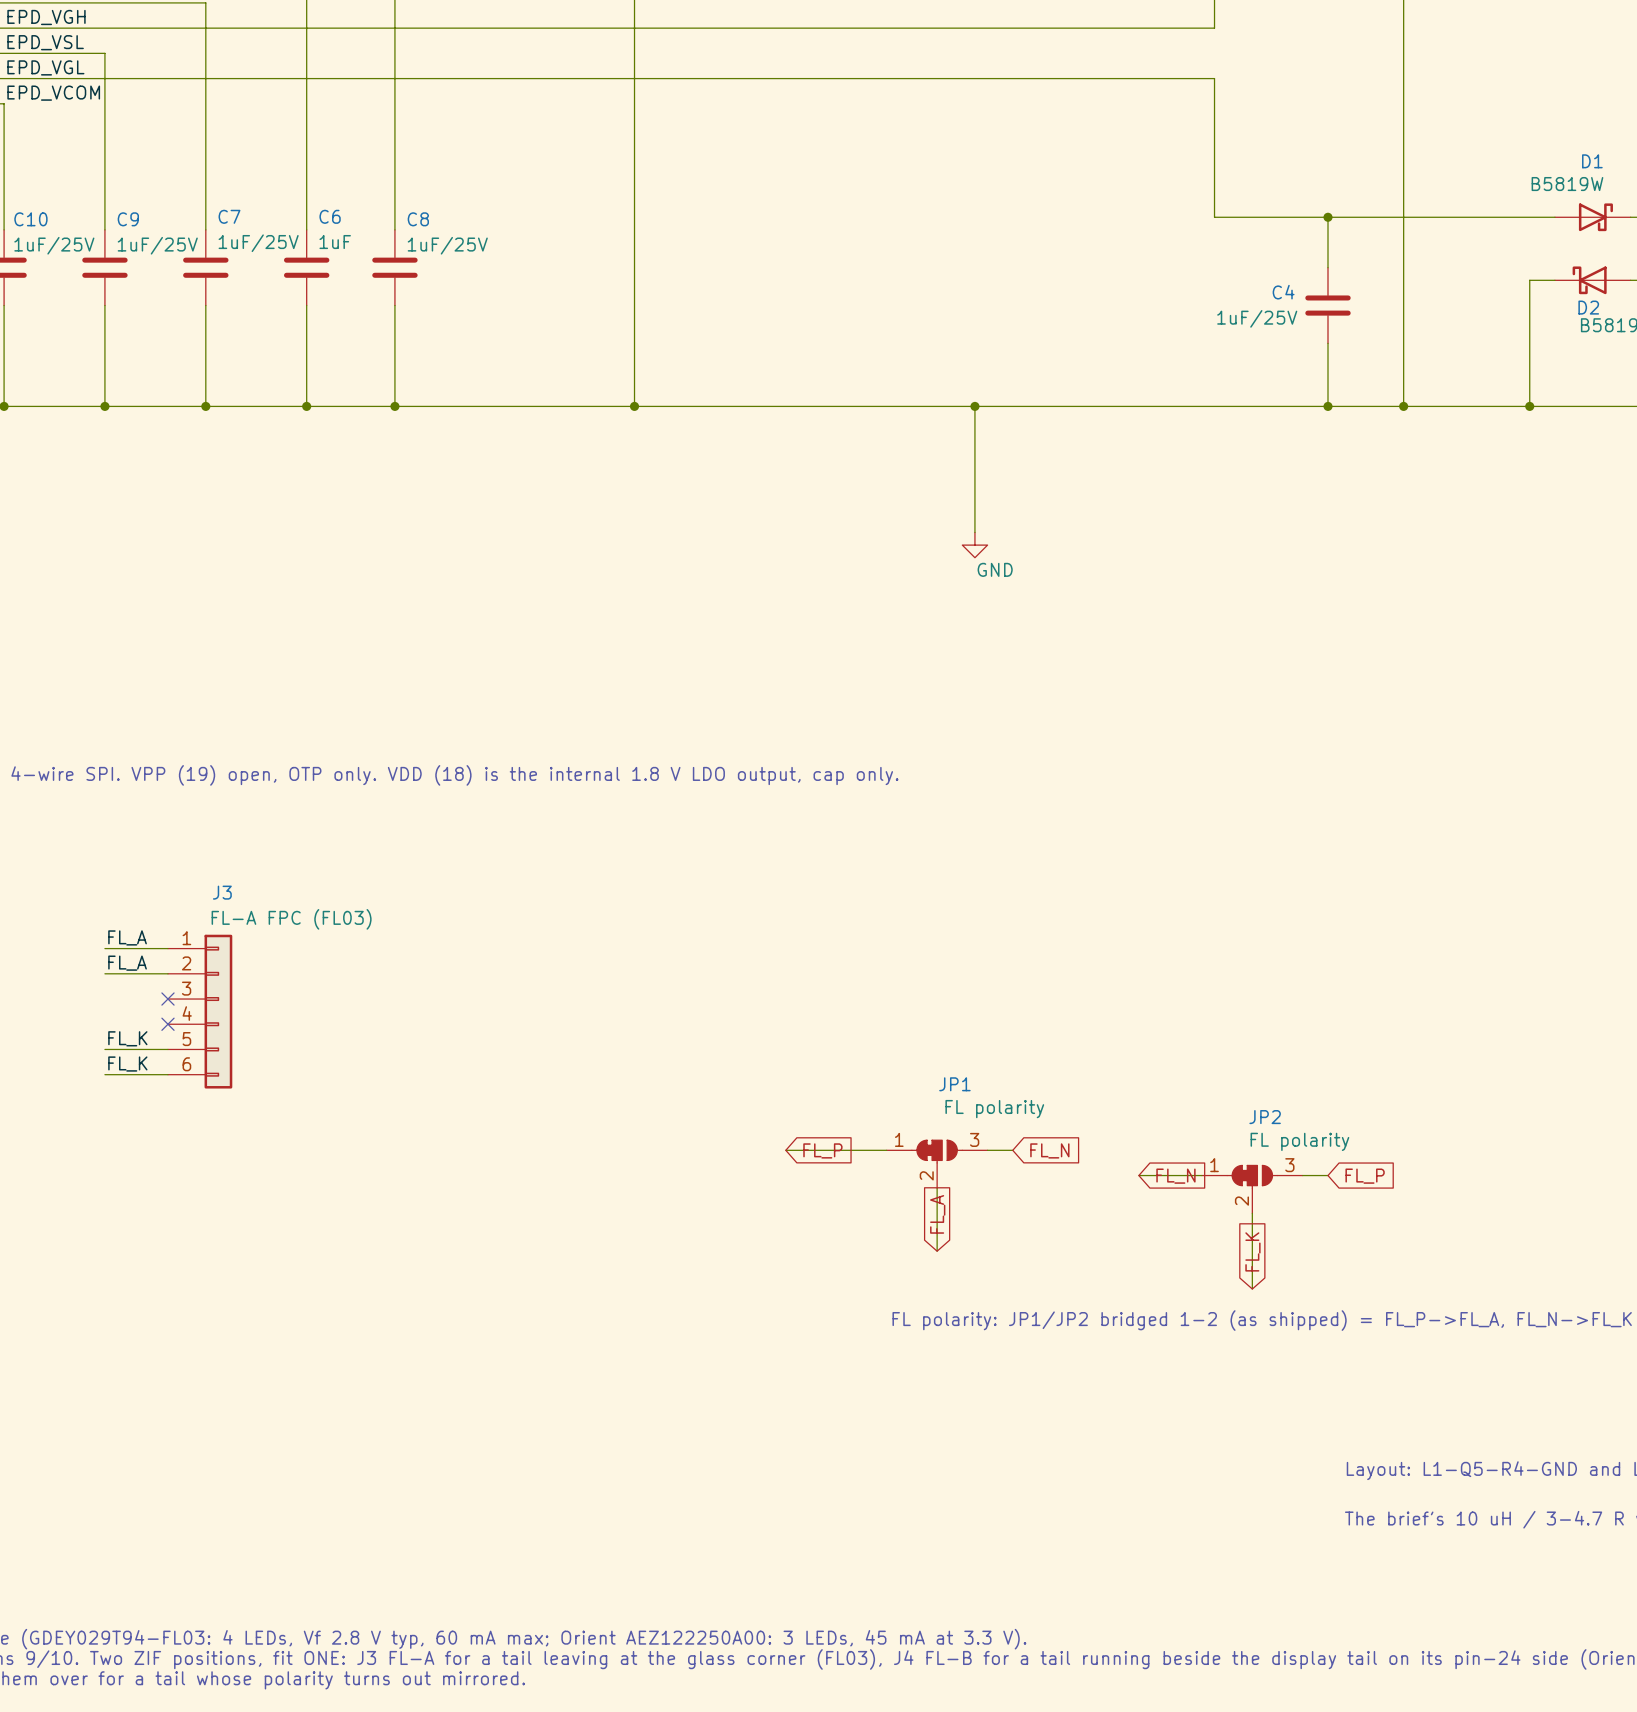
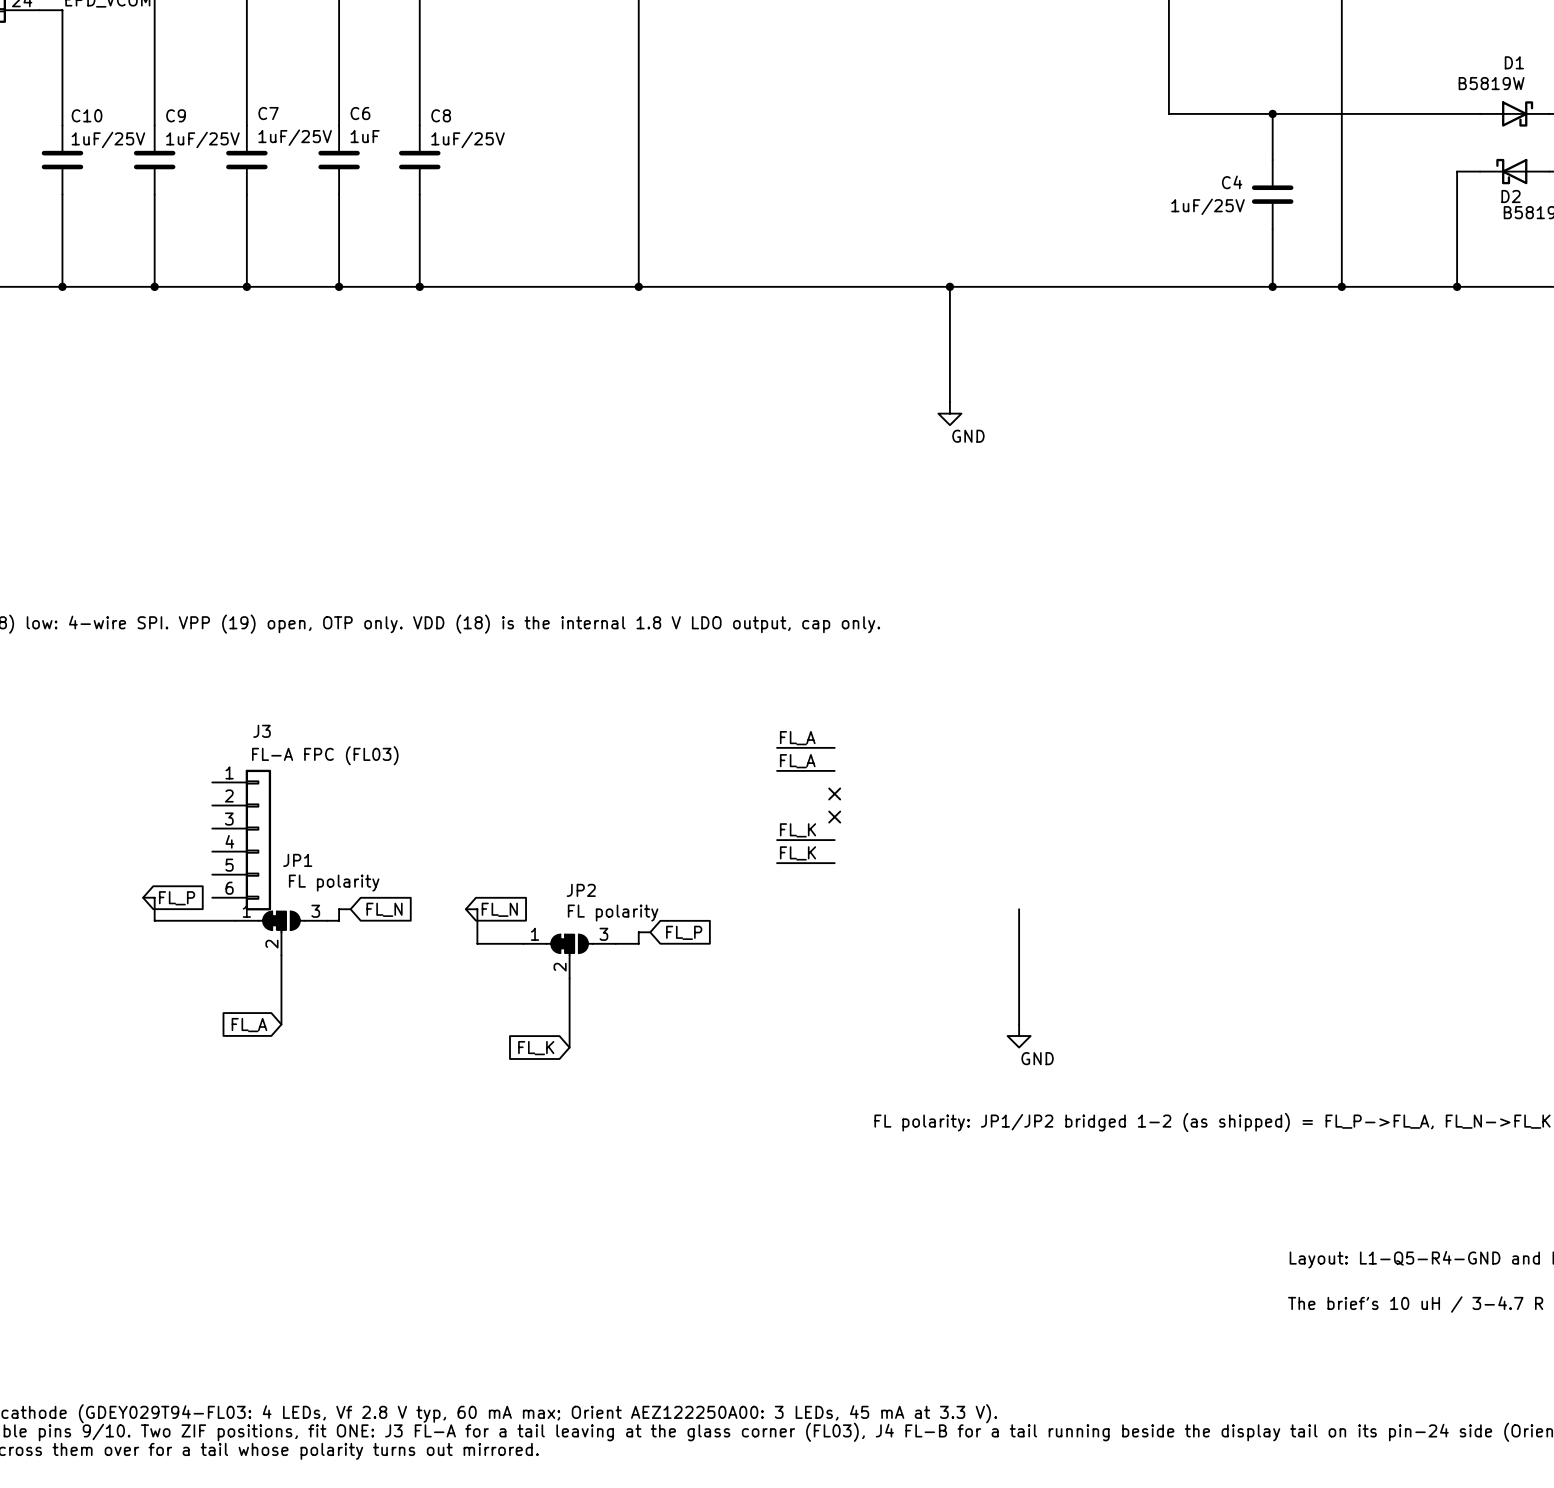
label: none -> FL_A (797, 738)
wire: none -> (777, 747) (834, 747)
label: none -> FL_A (797, 761)
wire: none -> (777, 770) (834, 770)
label: FL_A (127, 937) -> none
wire: (104, 948) (167, 948) -> none
no-connect mark: none -> (834, 793)
label: FL_A (127, 963) -> none
wire: (104, 973) (167, 973) -> none
no-connect mark: none -> (834, 817)
no-connect mark: (167, 999) -> none
label: none -> FL_K (798, 830)
wire: none -> (777, 840) (834, 840)
no-connect mark: (167, 1024) -> none
label: none -> FL_K (798, 853)
wire: none -> (777, 863) (834, 863)
label: FL_K (127, 1038) -> none
wire: (104, 1049) (167, 1049) -> none
label: FL_K (127, 1064) -> none
wire: none -> (143, 897) (154, 897) (154, 920) (235, 920)
wire: (104, 1074) (167, 1074) -> none
global label: none -> FL_P (177, 898)
wire: none -> (350, 909) (339, 909) (339, 920) (327, 920)
global label: none -> FL_N (384, 909)
wire: none -> (465, 909) (477, 909) (477, 943) (523, 943)
global label: none -> FL_N (499, 909)
wire: none -> (1019, 909) (1019, 1024)
wire: none -> (650, 932) (638, 932) (638, 943) (615, 943)
wire: none -> (281, 955) (281, 1024)
wire: (785, 1150) (886, 1150) -> none
global label position: FL_P (822, 1150) -> FL_P (684, 932)
wire: (987, 1150) (1012, 1150) -> none
global label: FL_N (1049, 1150) -> none
wire: none -> (569, 978) (569, 1047)
JP1 position: (937, 1164) -> (281, 933)
wire: (1138, 1175) (1201, 1175) -> none
wire: (1302, 1175) (1327, 1175) -> none
global label: FL_N (1175, 1176) -> none
global label: FL_P (1365, 1176) -> none
wire: (937, 1188) (937, 1251) -> none
JP2 position: (1252, 1189) -> (569, 956)
global label: none -> FL_A (249, 1025)
wire: (1252, 1213) (1252, 1289) -> none
global label: FL_A (937, 1214) -> none
power symbol: none -> GND (1019, 1036)
global label: none -> FL_K (536, 1048)
global label: FL_K (1252, 1251) -> none

